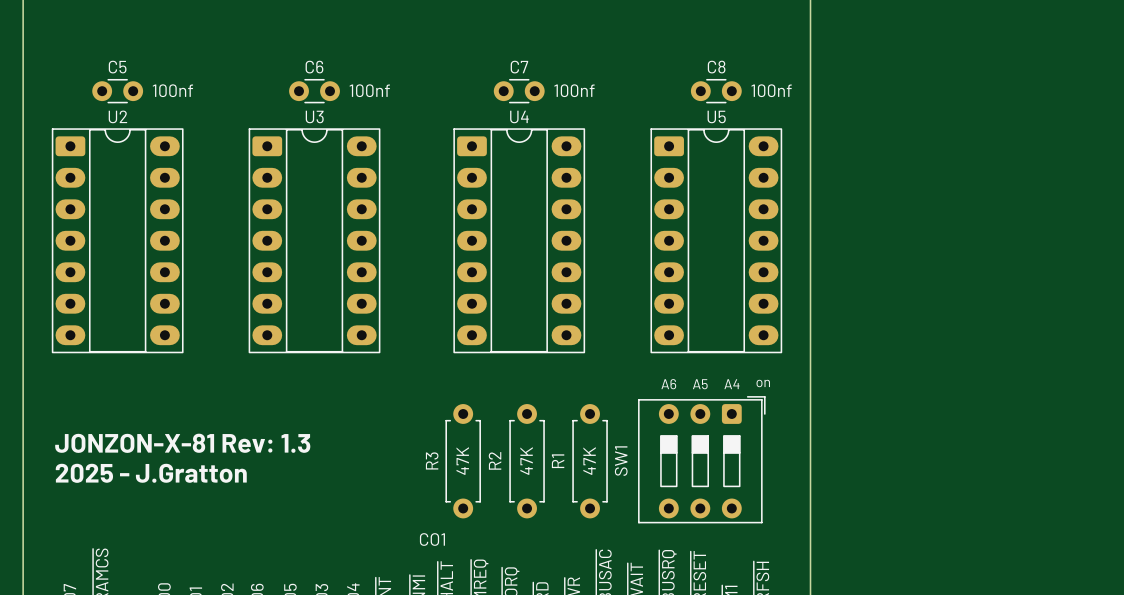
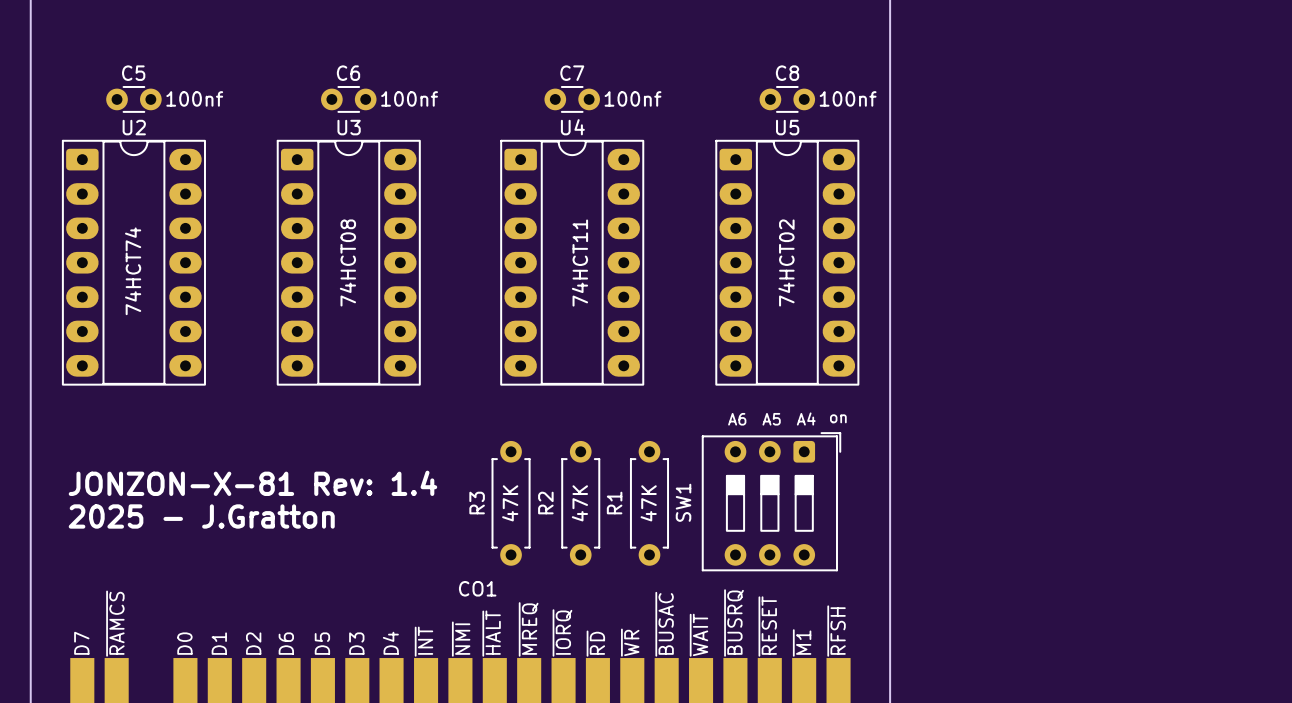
U3 value: none -> 74HCT08 (347, 262)
U5 value: none -> 74HCT02 (786, 262)
U4 value: none -> 74HCT11 (579, 263)
U2 value: none -> 74HCT74 (133, 271)
text: JONZON-X-81 Rev: 1.3 (182, 443) -> JONZON-X-81 Rev: 1.4 (252, 483)

